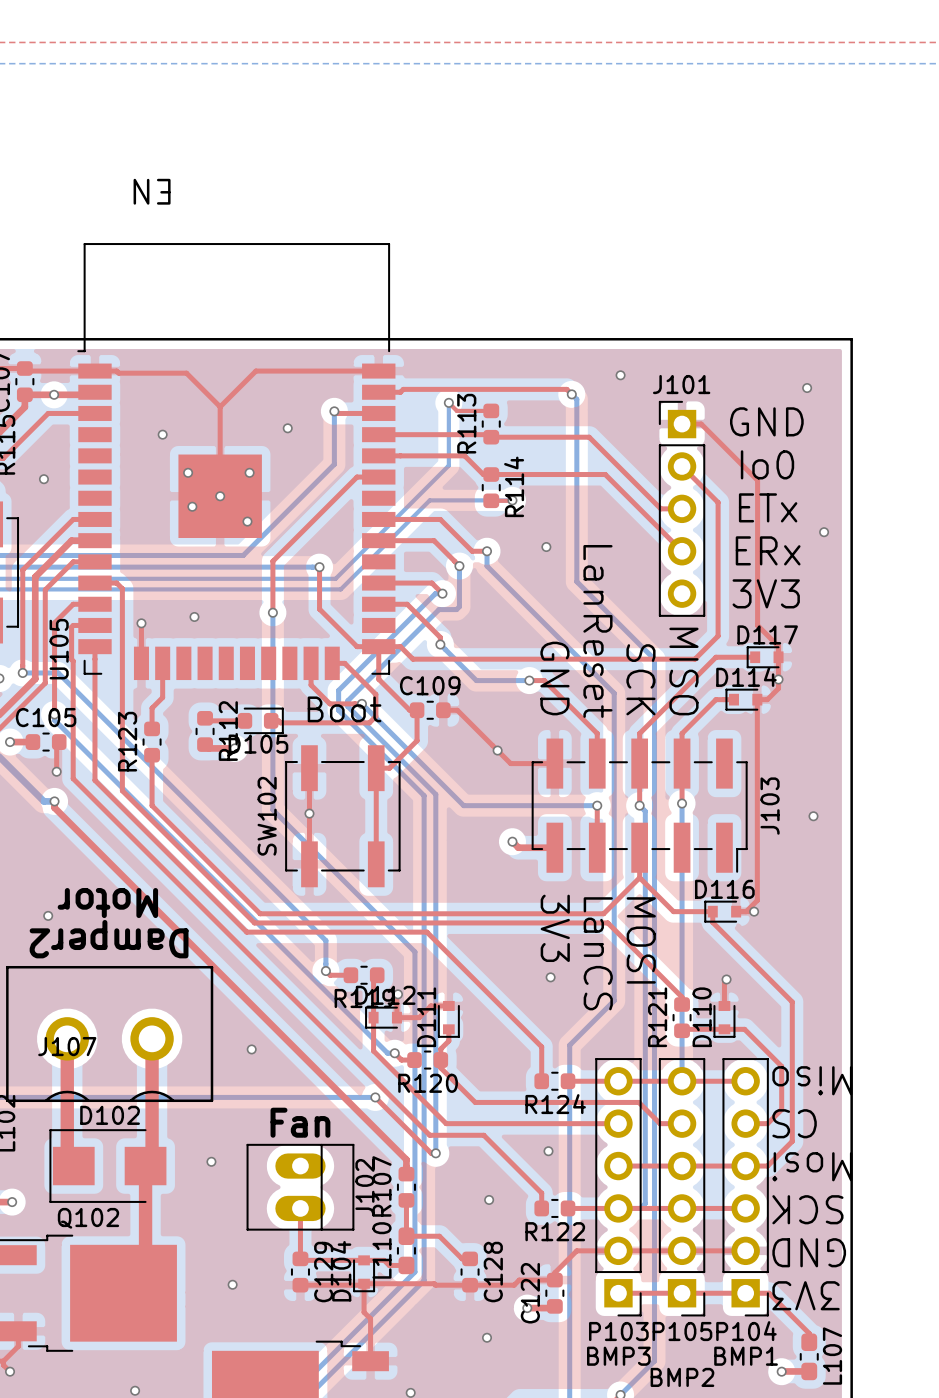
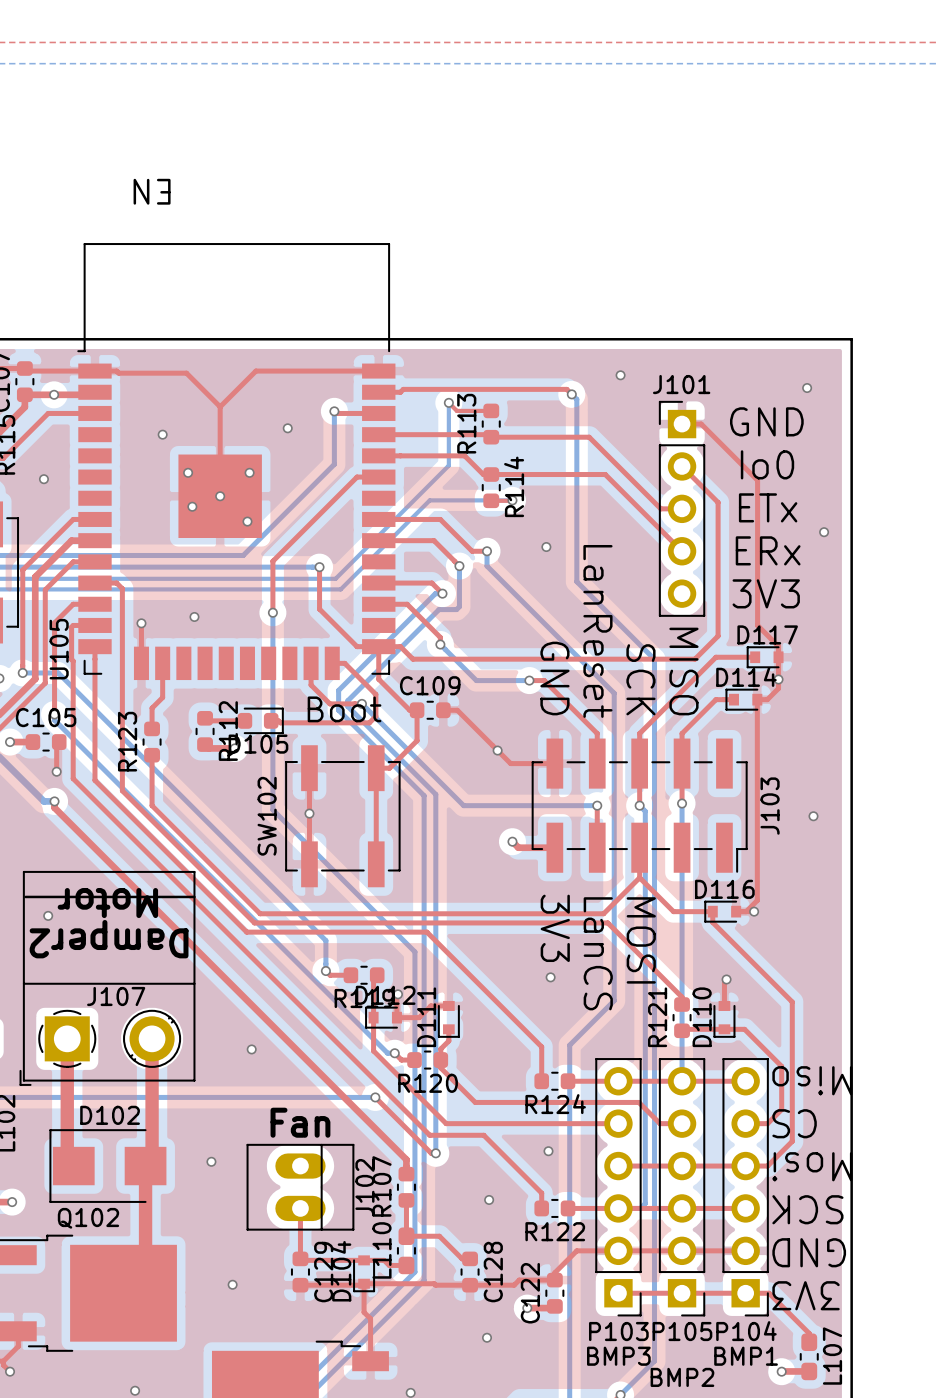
J107 footprint: [6, 965, 214, 1103] -> [19, 870, 196, 1086]
J107 name position: J107 (67, 1046) -> J107 (116, 996)

